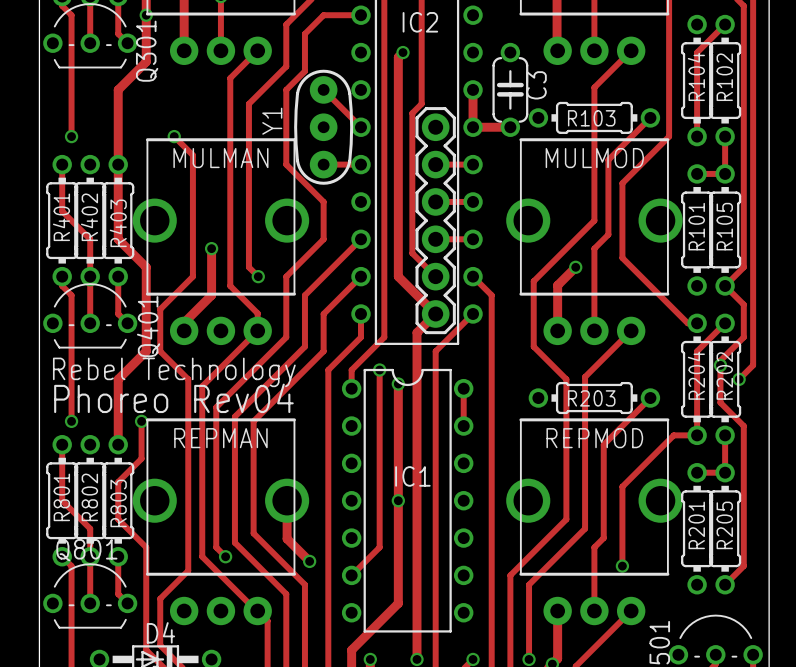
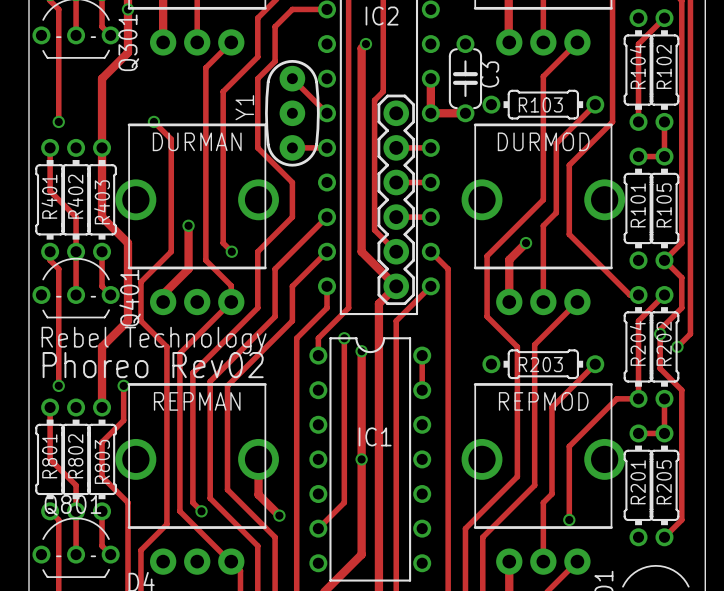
MULMAN name: MULMAN (220, 158) -> DURMAN (197, 141)
MULMOD name: MULMOD (594, 158) -> DURMOD (543, 141)
text: Phoreo Rev04 (173, 398) -> Phoreo Rev02 (153, 365)

